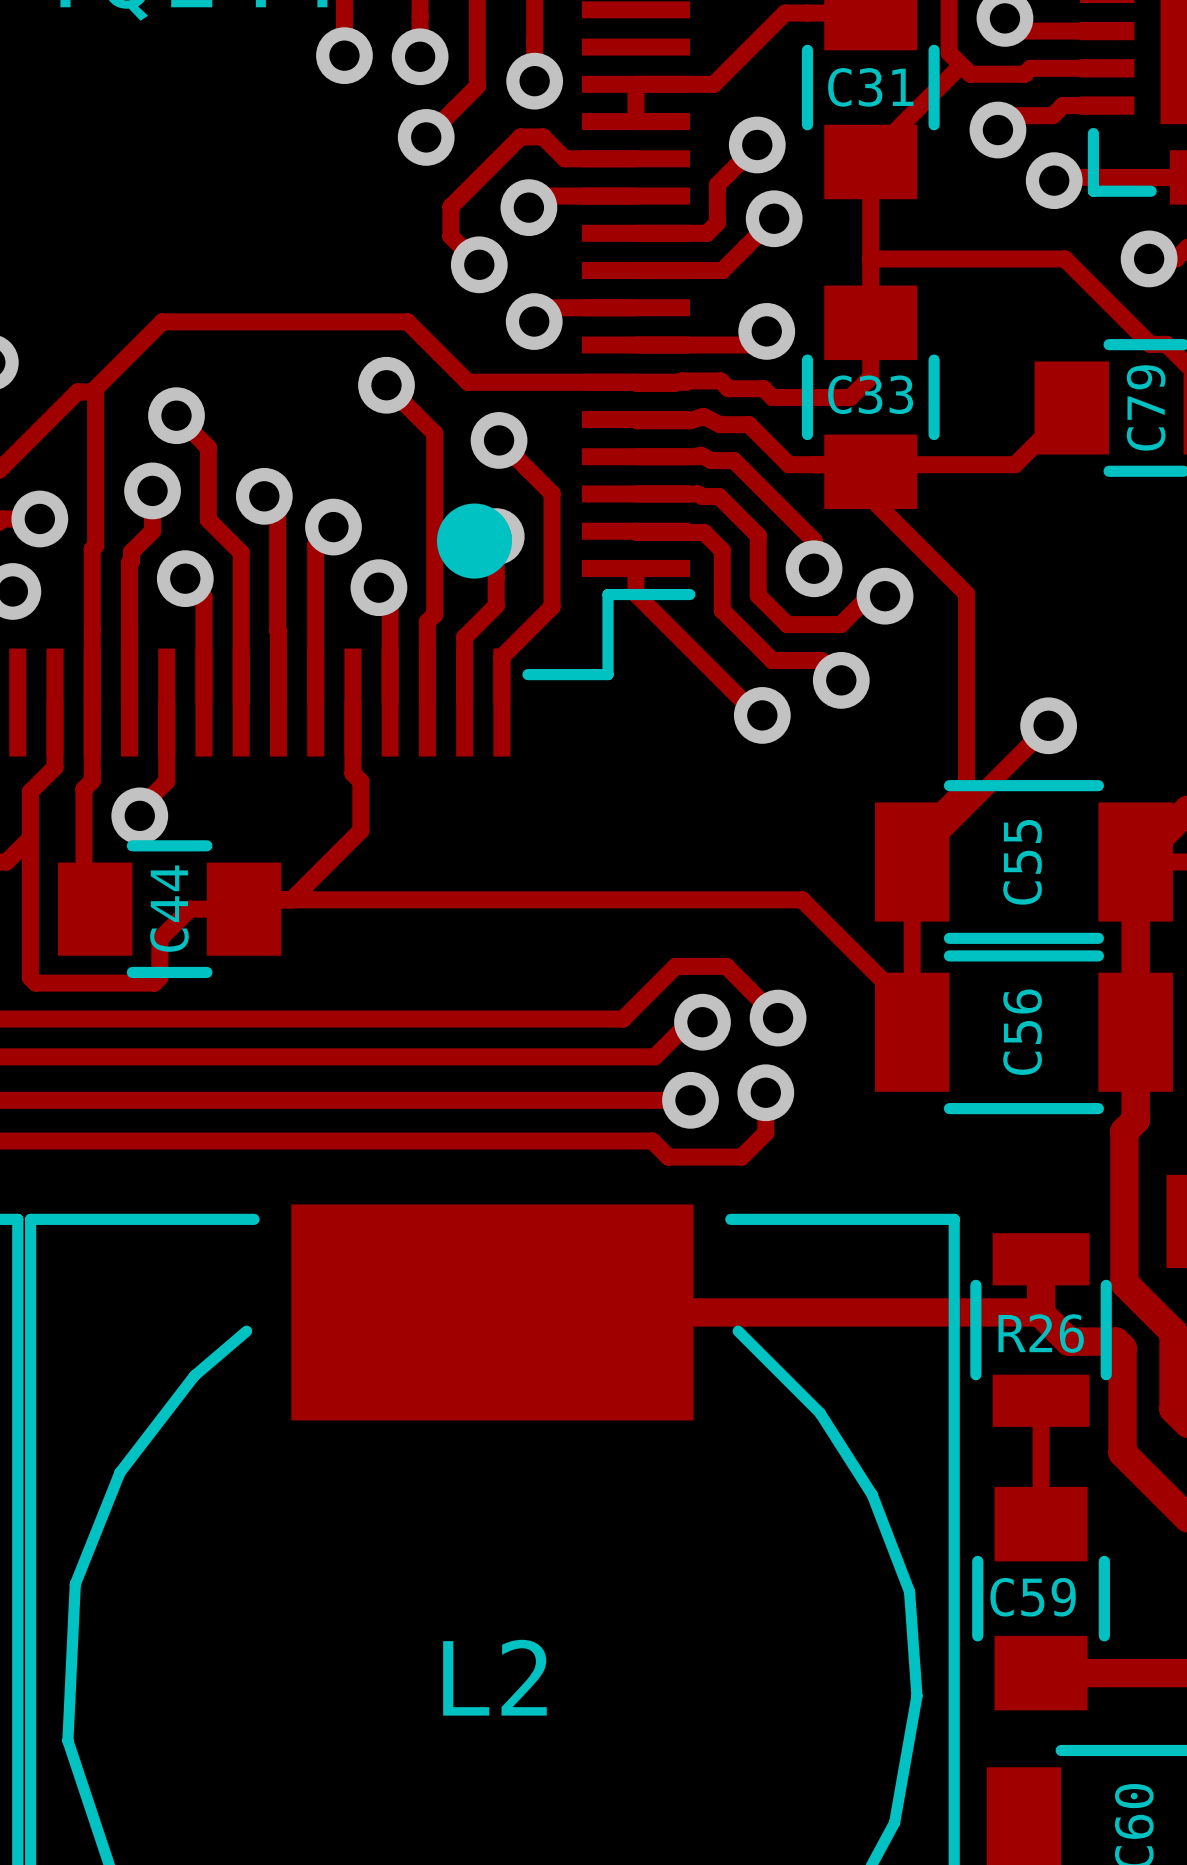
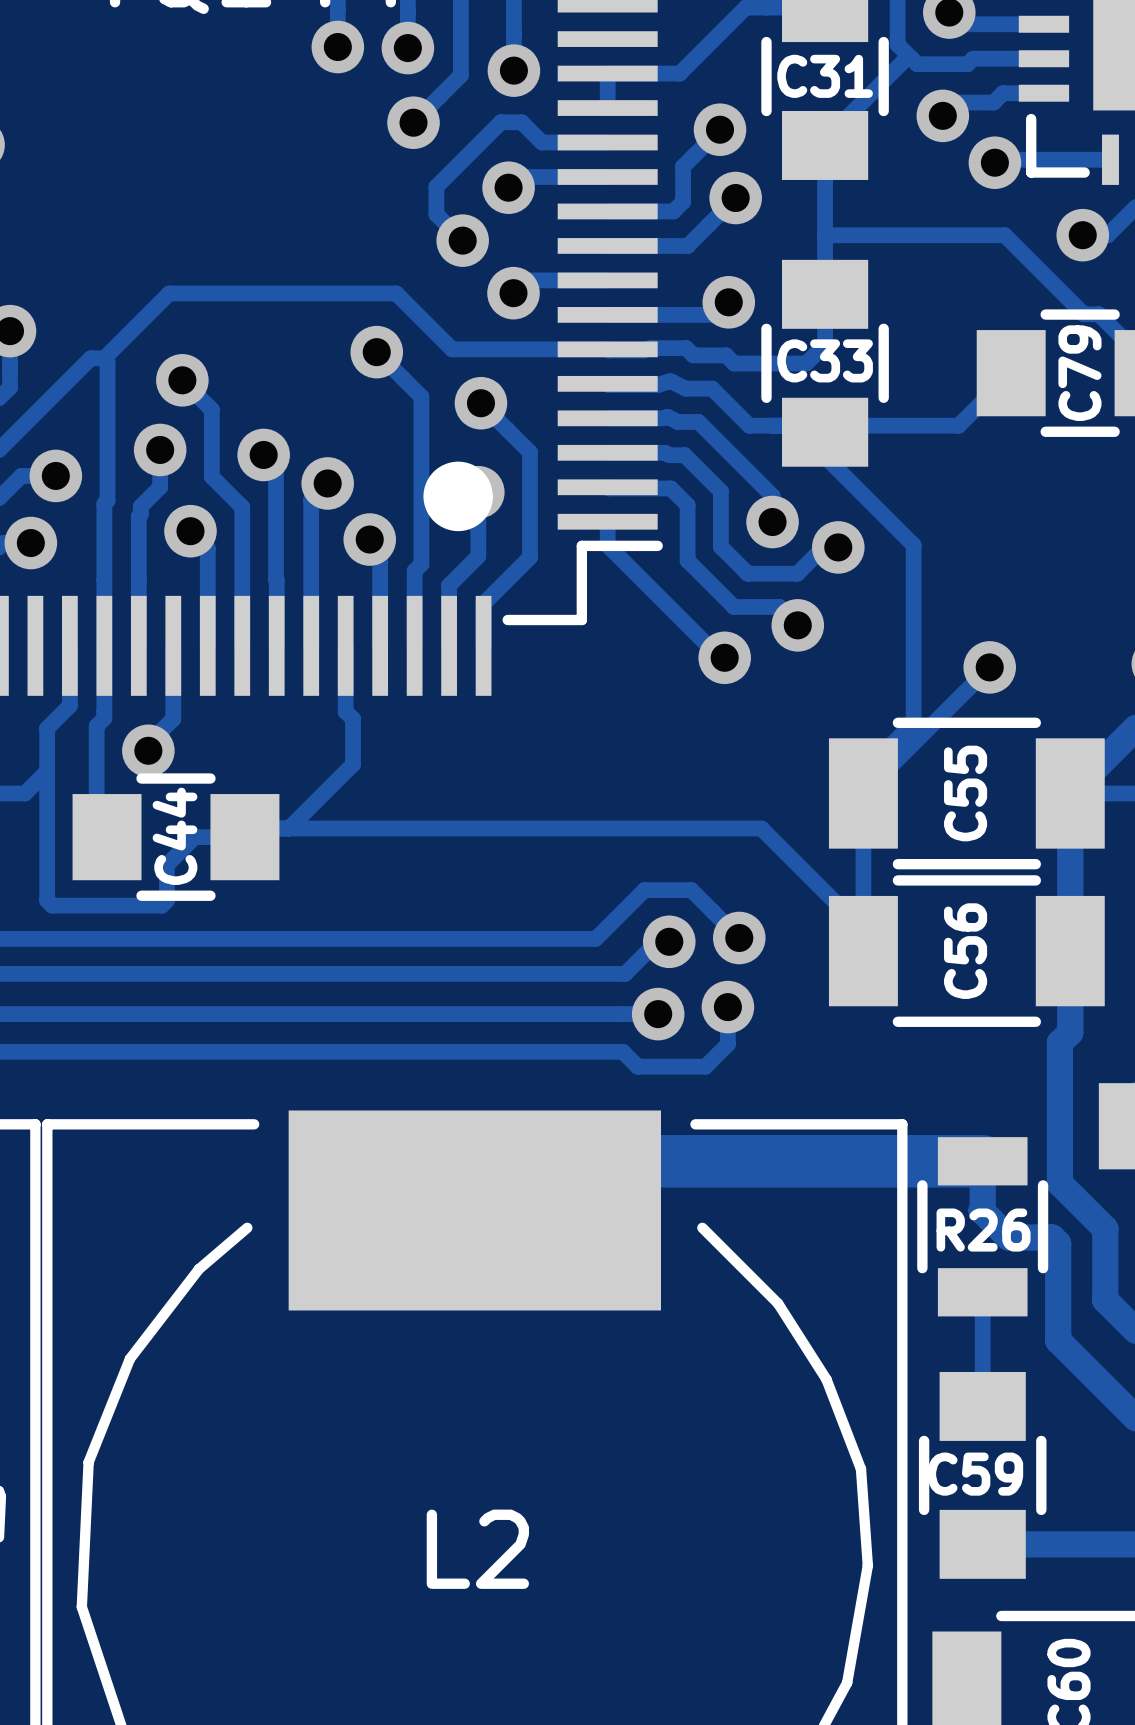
track: none -> (982, 1161) (524, 1161) (474, 1210)
track: (615, 1312) (492, 1312) (1039, 1312) -> none

